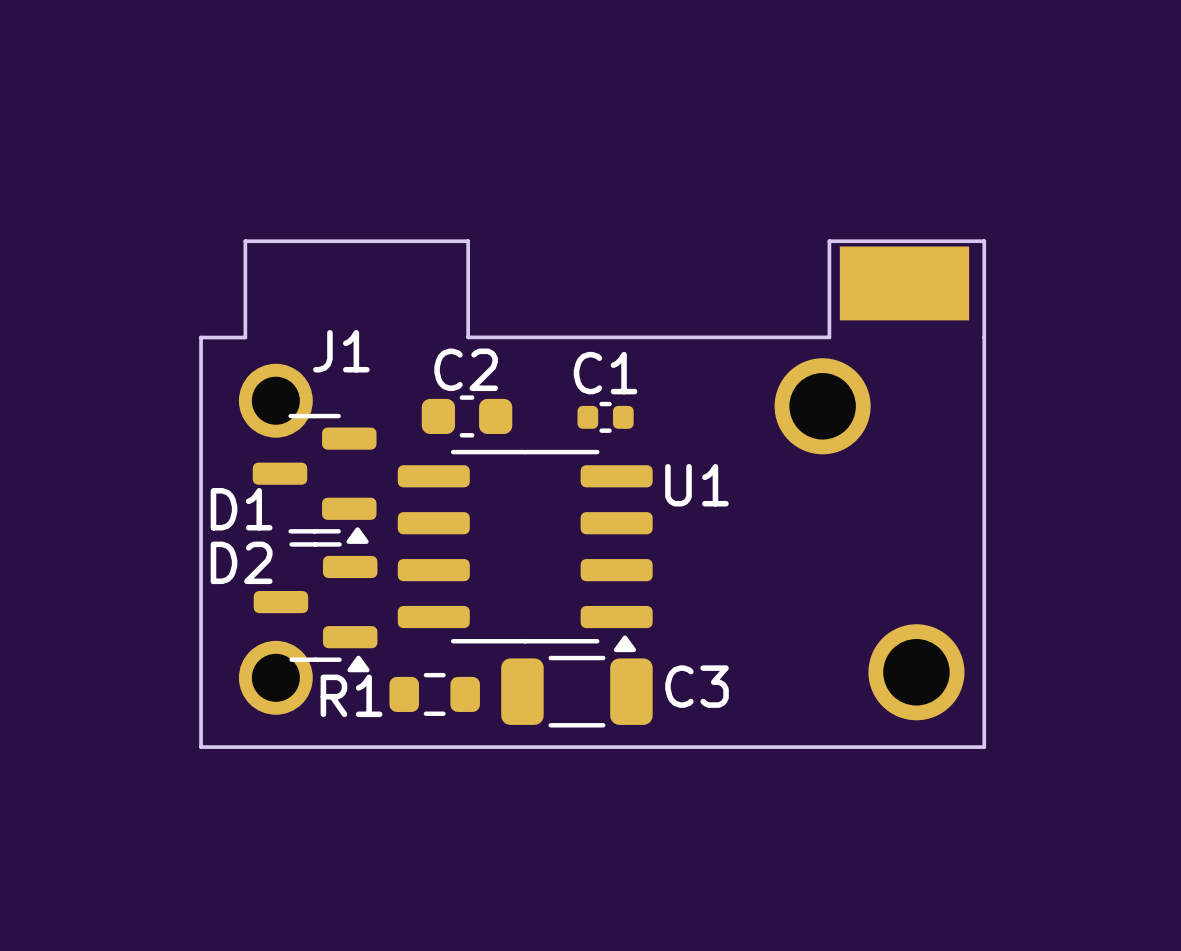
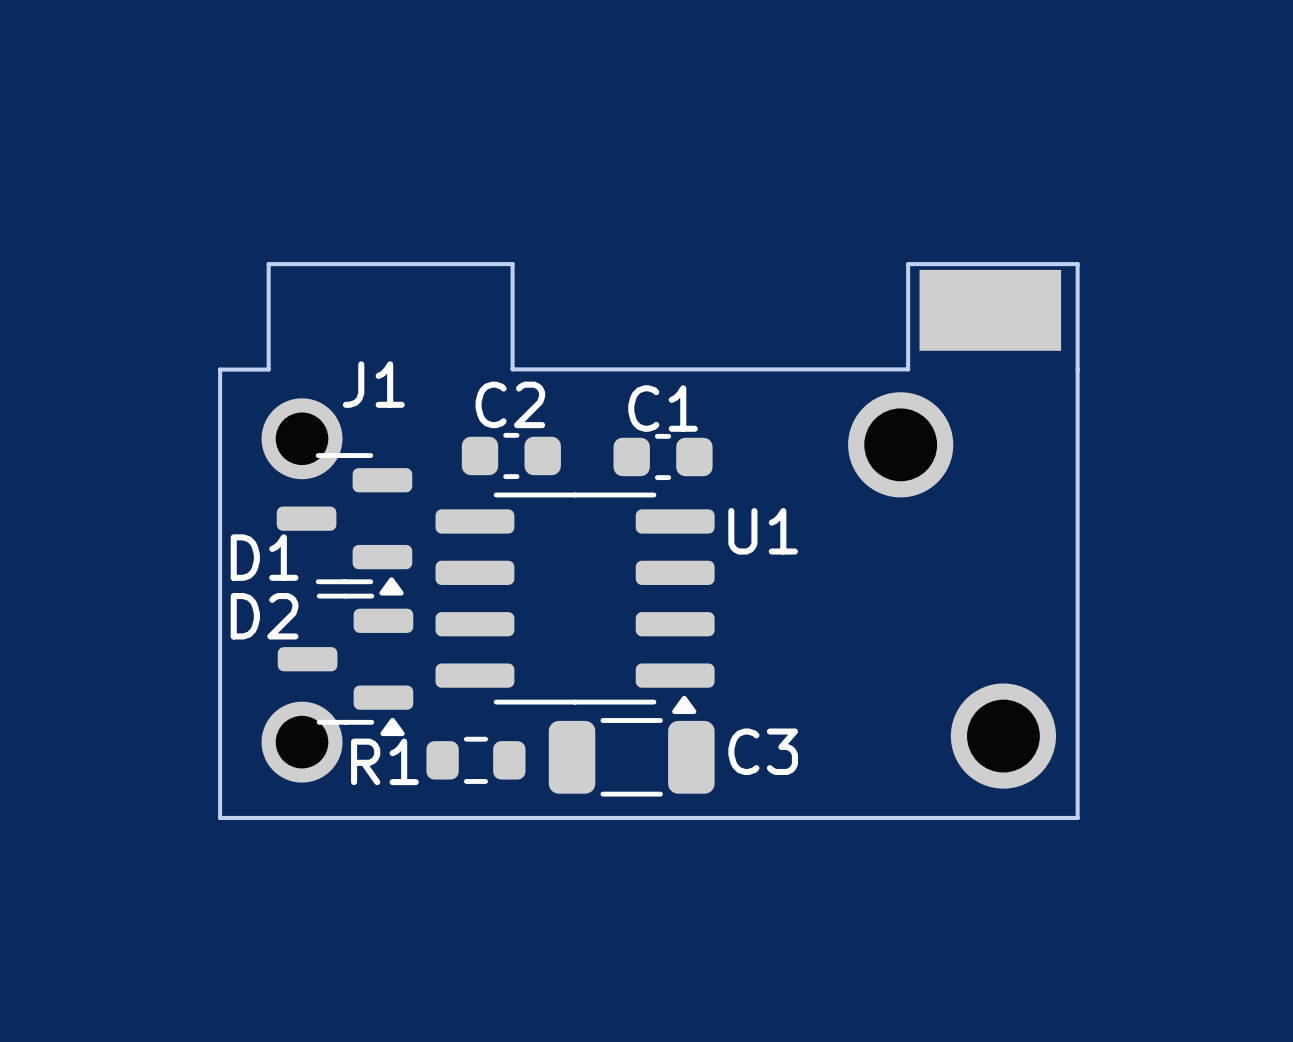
C1 footprint: [577, 401, 634, 433] -> [613, 433, 713, 481]

